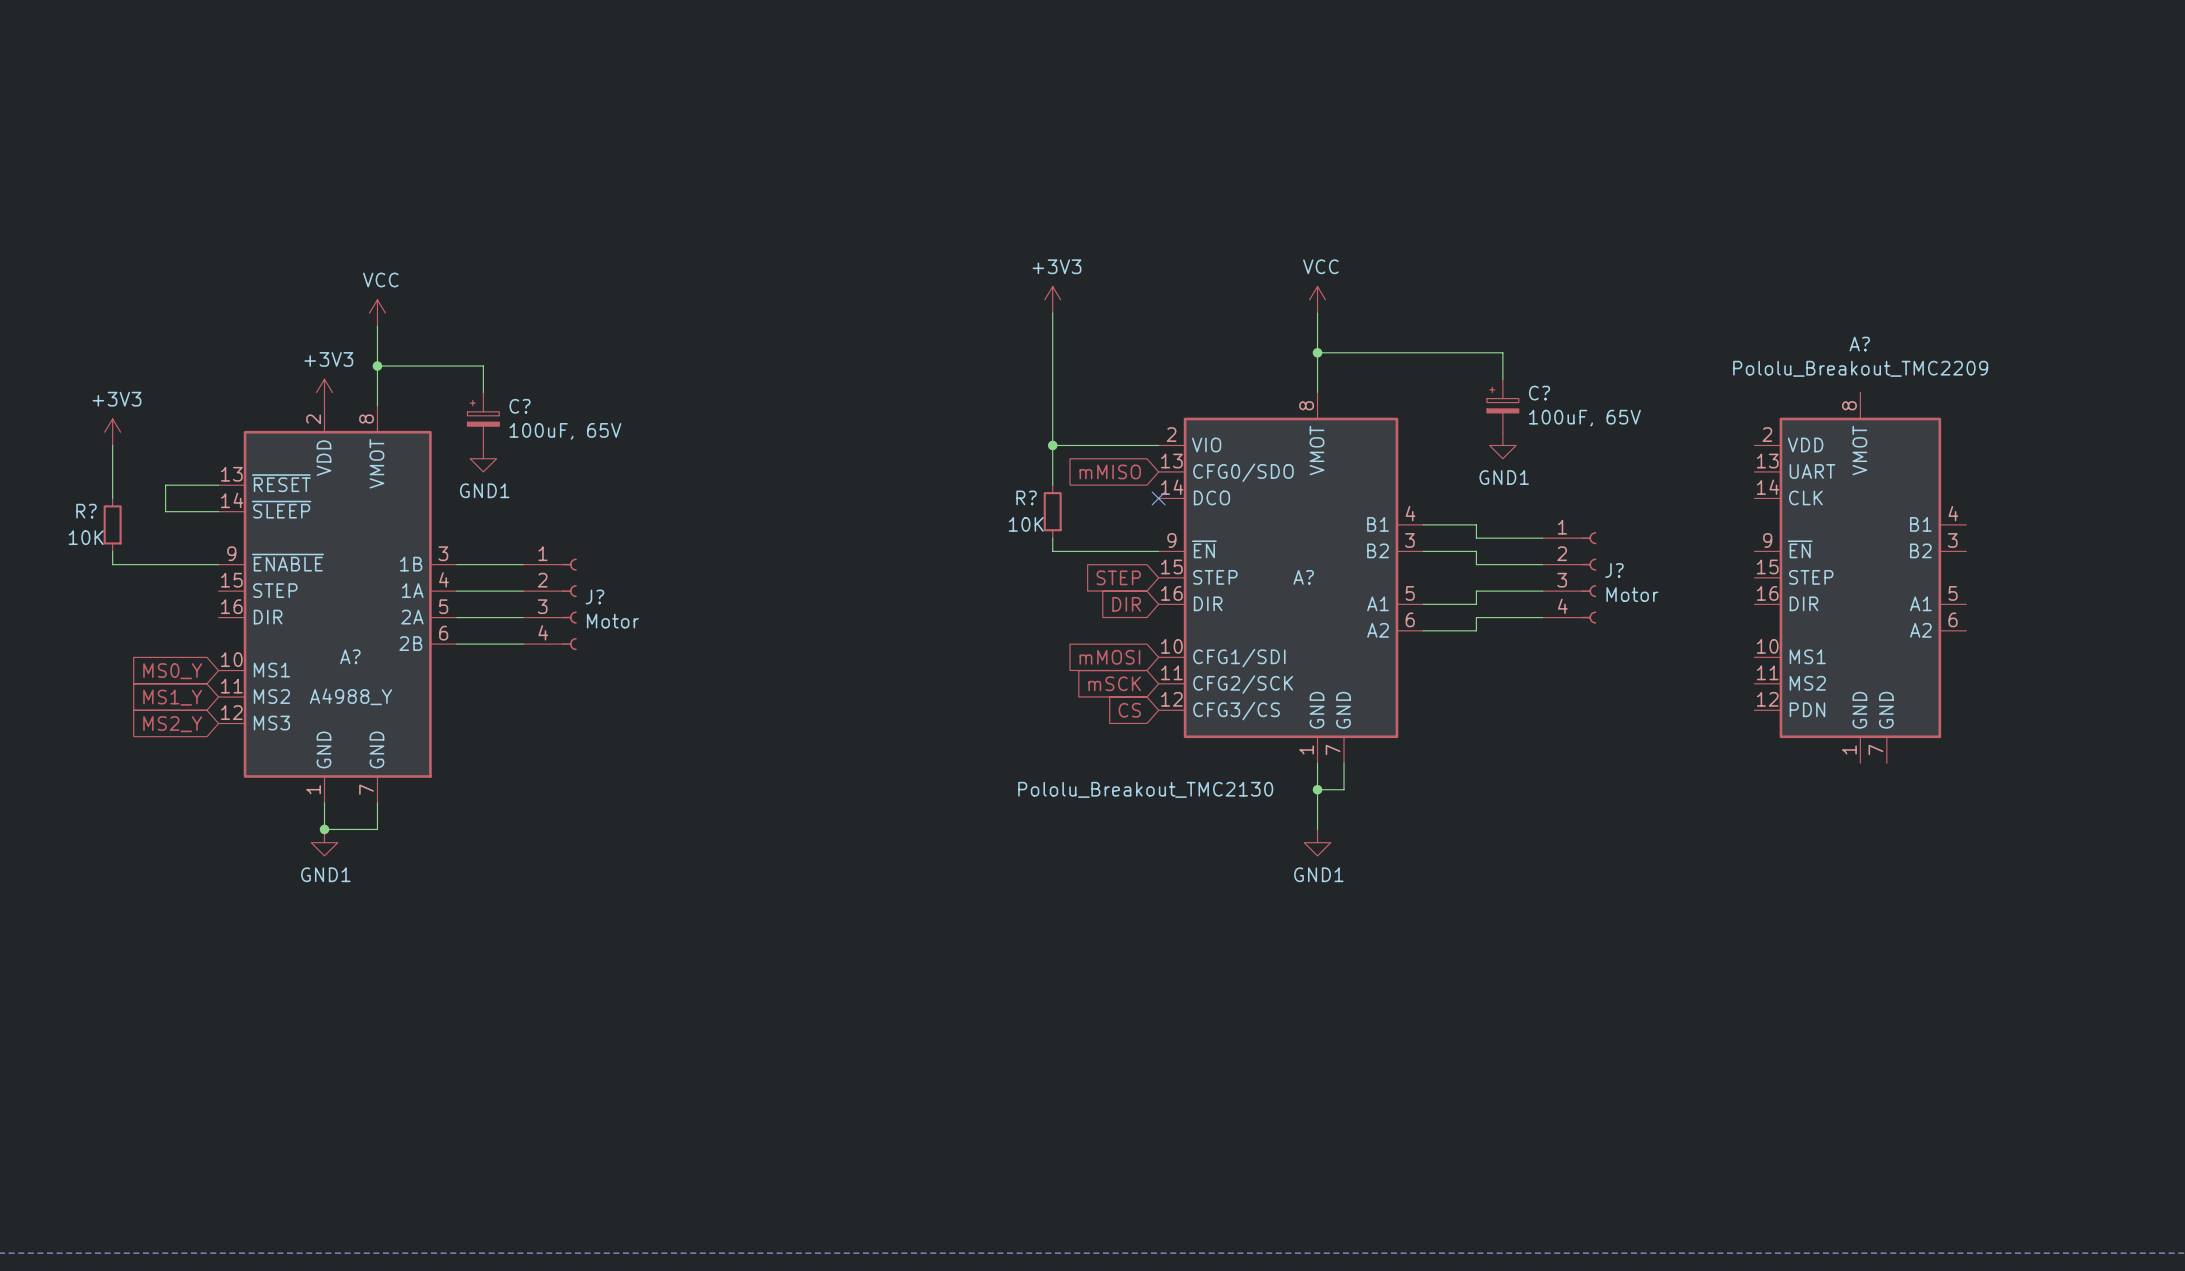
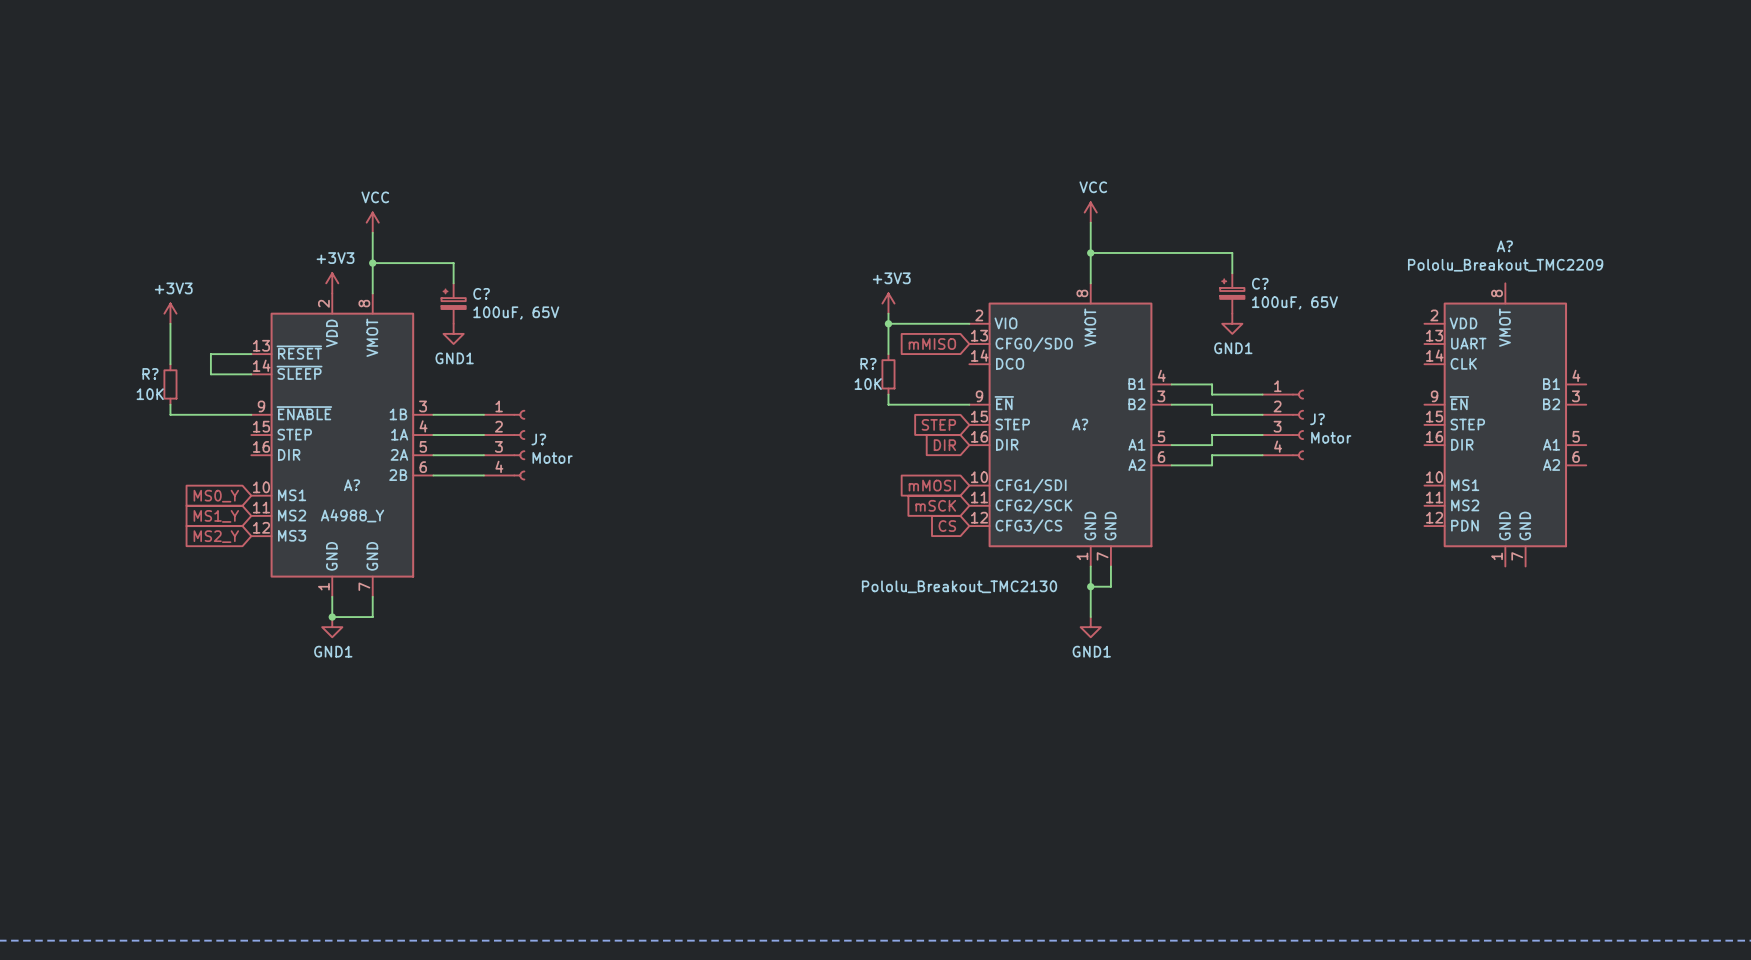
power symbol position: +3V3 (1052, 299) -> +3V3 (888, 303)
wire: (1052, 313) (1052, 432) -> none
no-connect mark: (1158, 498) -> none

